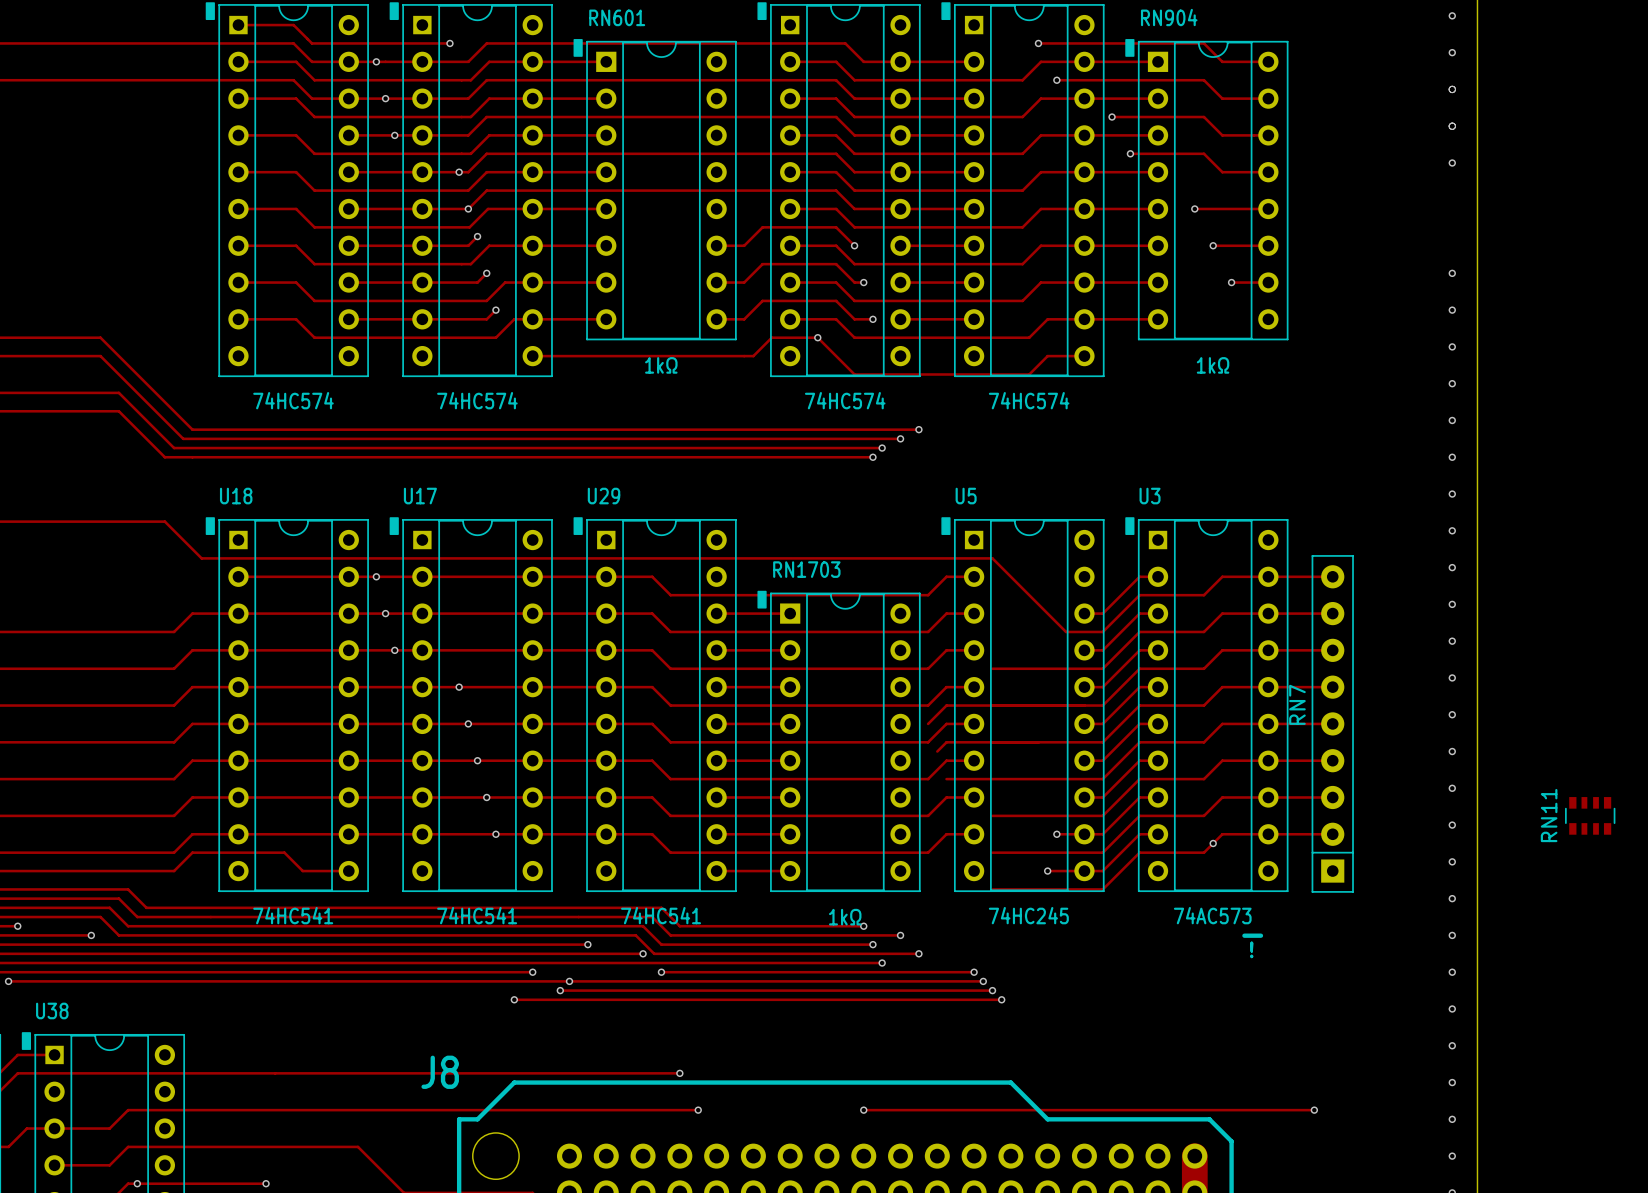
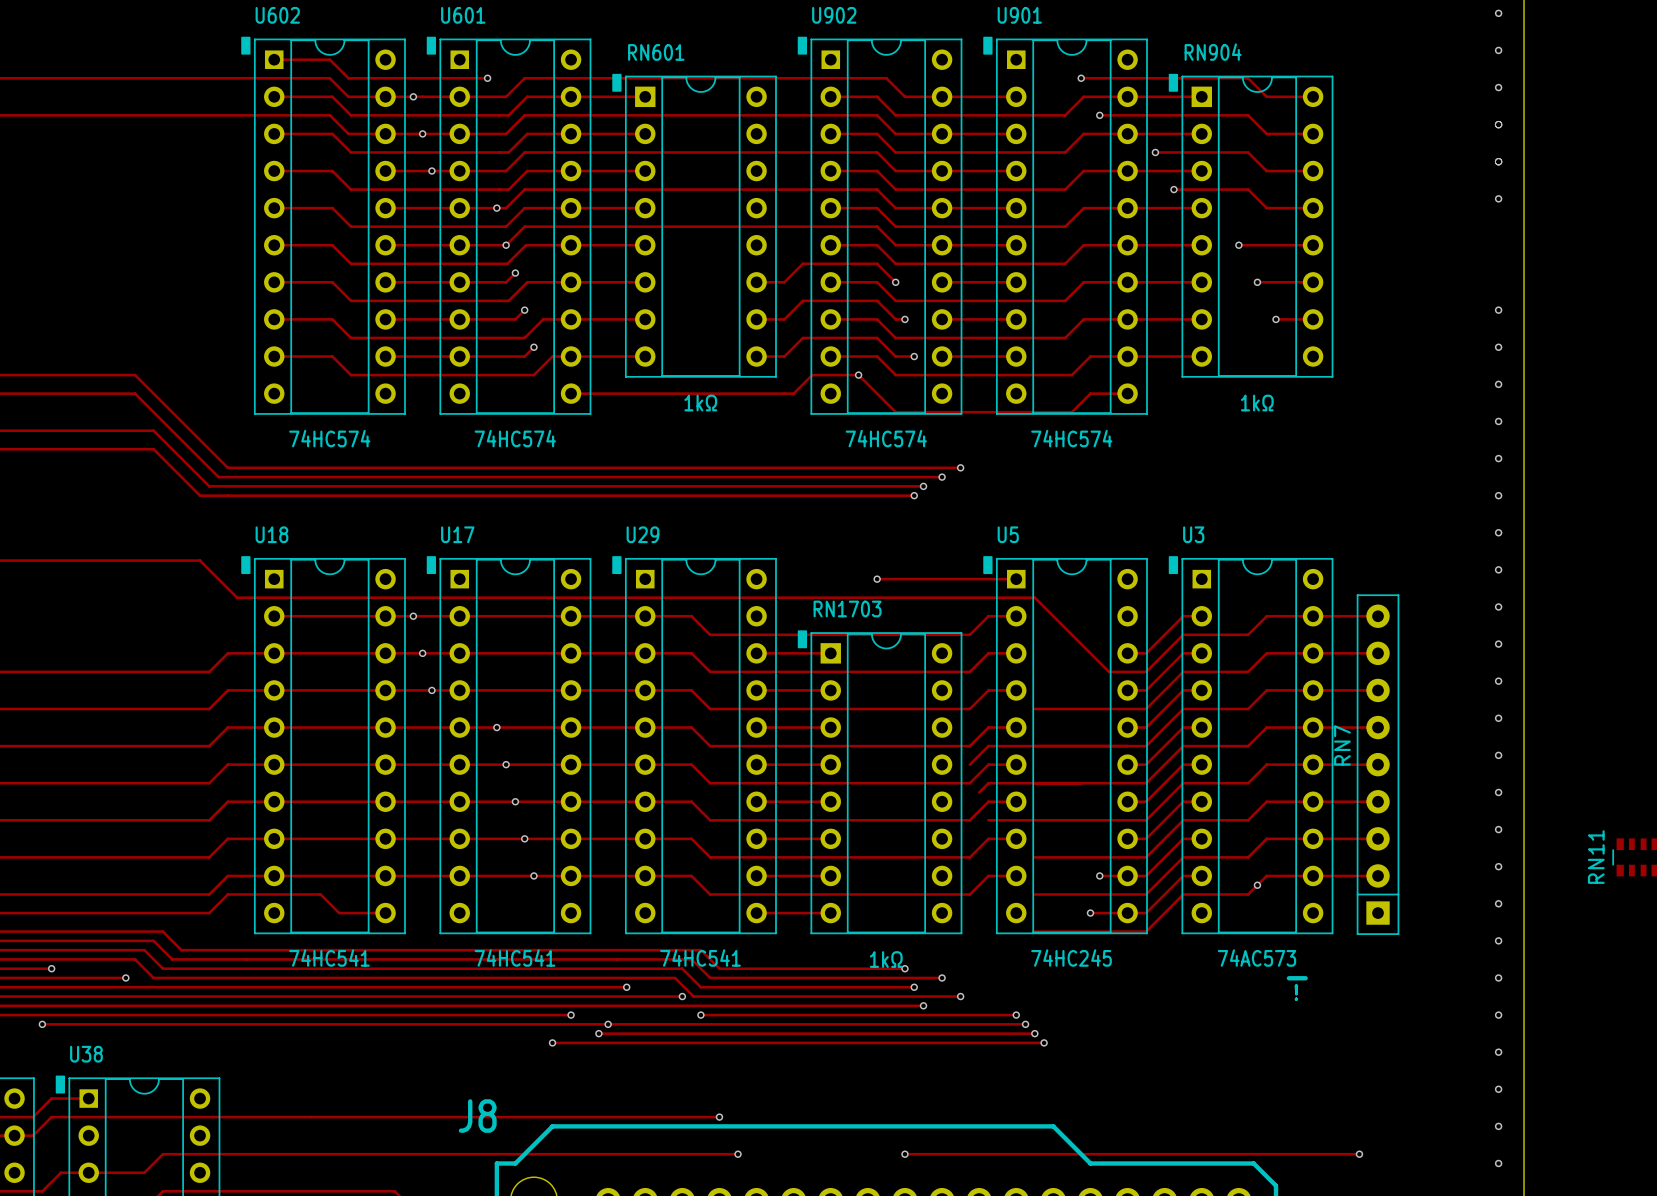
track: none -> (877, 579) (1016, 579)
via: none -> (877, 579)

